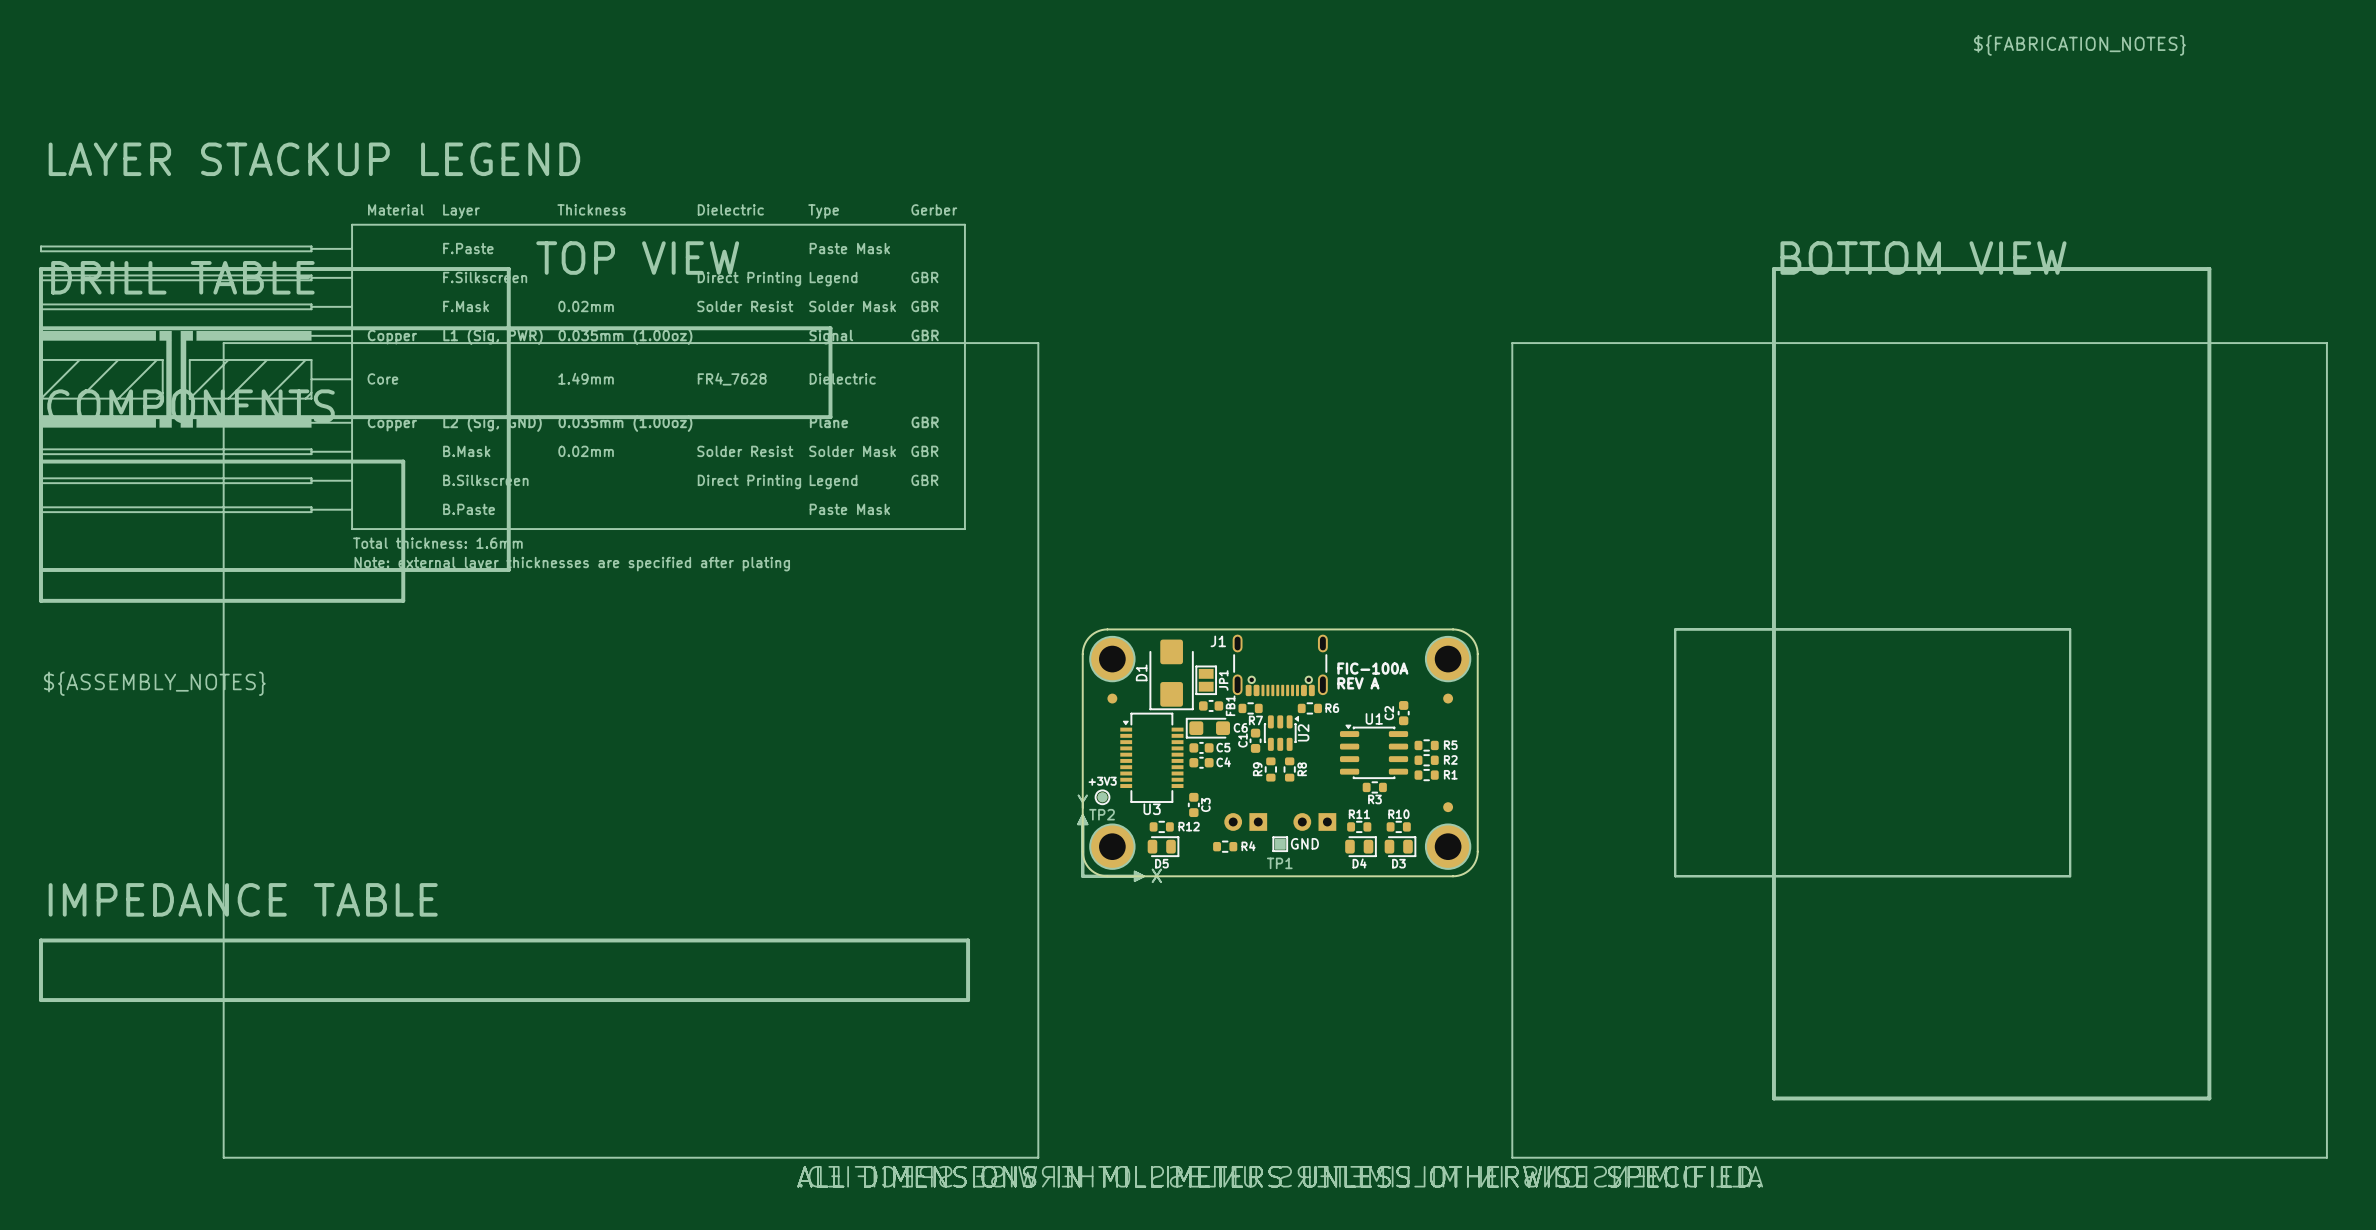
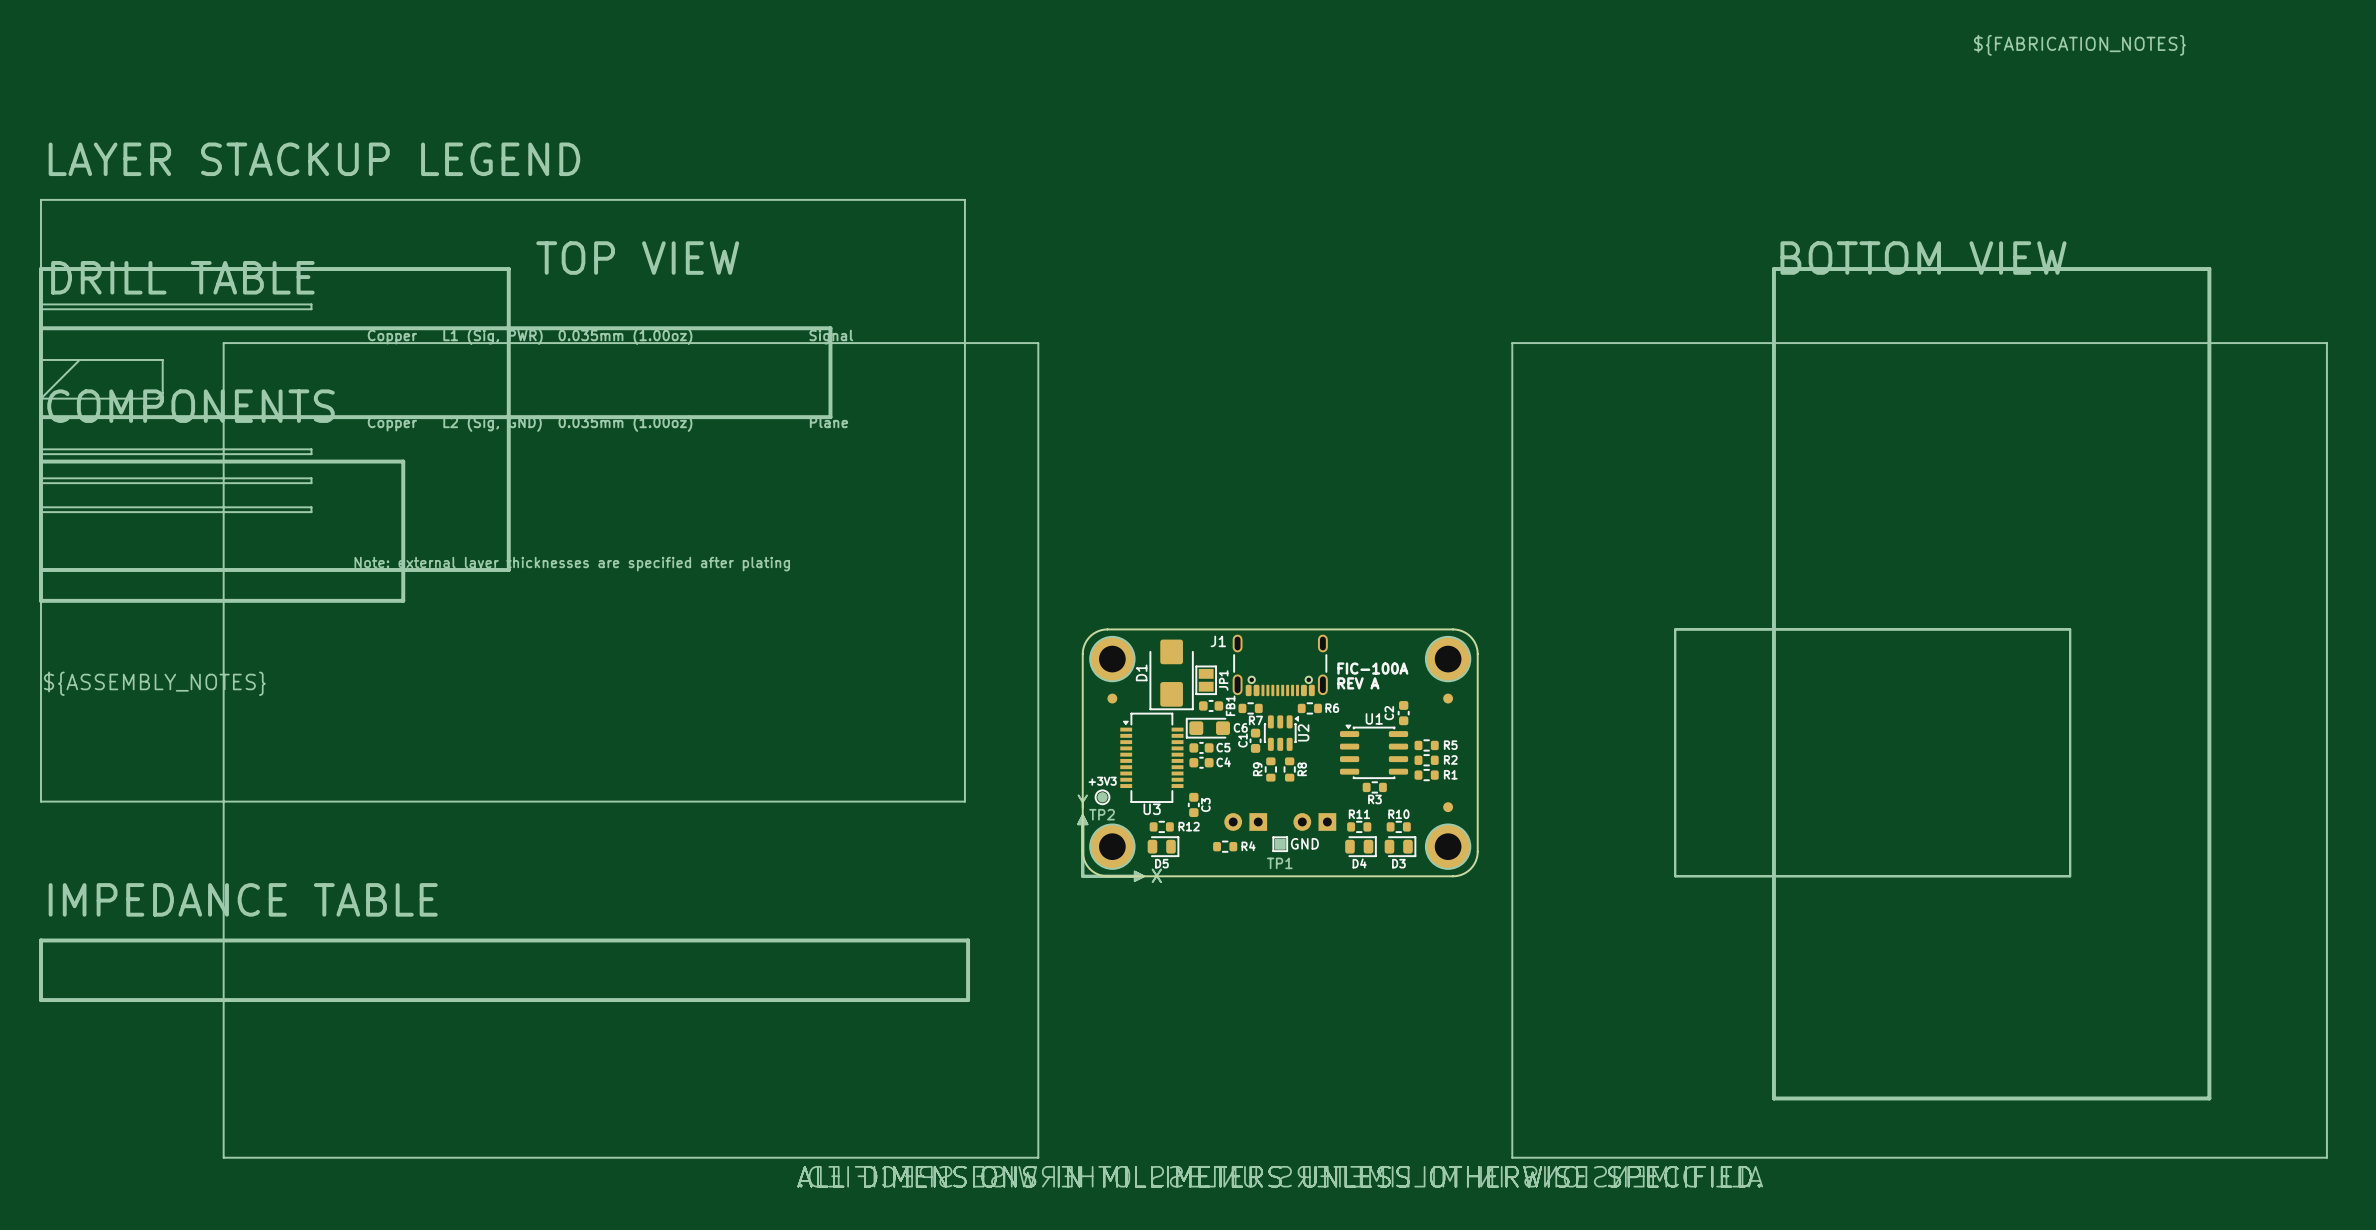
text: Material (396, 209) -> none
text: Thickness (591, 209) -> none
text: Dielectric (730, 209) -> none
text: Gerber (934, 209) -> none
text: Layer (461, 211) -> none
text: Type (823, 211) -> none
line: (964, 224) (352, 224) (352, 529) (964, 529) -> (40, 512) (40, 801) (964, 801) (964, 529)
line: (40, 246) (311, 246) (311, 251) (40, 251) -> (40, 246) (40, 199) (964, 199) (964, 224)
line: (311, 248) (352, 248) -> none
text: F.Paste (468, 248) -> none
text: Paste Mask (849, 248) -> none
line: (40, 275) (311, 275) (311, 280) (40, 280) -> (40, 275) (40, 251)
line: (311, 277) (352, 277) -> none
text: F.Silkscreen (485, 277) -> none
text: GBR (924, 277) -> none
text: Direct Printing (749, 279) -> none
text: Legend (833, 279) -> none
line: (311, 306) (352, 306) -> none
text: F.Mask (466, 306) -> none
text: 0.02mm (586, 306) -> none
text: Solder Resist (745, 306) -> none
text: Solder Mask (852, 306) -> none
text: GBR (924, 306) -> none
drawing: [40, 330, 312, 428] -> none
line: (311, 335) (352, 335) -> none
text: GBR (925, 335) -> none
line: (118, 359) (79, 398) -> none
line: (156, 359) (118, 398) -> none
line: (228, 359) (189, 398) -> none
line: (267, 359) (228, 398) -> none
line: (305, 359) (267, 398) -> none
text: Core (382, 378) -> none
text: 1.49mm (586, 378) -> none
text: Dielectric (842, 378) -> none
line: (311, 379) (352, 379) -> none
text: FR4_7628 (732, 379) -> none
line: (311, 392) (305, 398) -> none
line: (189, 398) (311, 398) (311, 359) (189, 359) (189, 398) -> none
line: (311, 422) (352, 422) -> none
text: GBR (925, 422) -> none
line: (311, 451) (352, 451) -> none
text: B.Mask (466, 451) -> none
text: 0.02mm (586, 451) -> none
text: Solder Resist (745, 451) -> none
text: Solder Mask (852, 451) -> none
text: GBR (924, 451) -> none
line: (311, 480) (352, 480) -> none
text: B.Silkscreen (485, 480) -> none
text: GBR (924, 480) -> none
text: Direct Printing (749, 481) -> none
text: Legend (833, 481) -> none
line: (311, 509) (352, 509) -> none
text: B.Paste (469, 509) -> none
text: Paste Mask (849, 509) -> none
text: Total thickness: 1.6mm (437, 543) -> none

